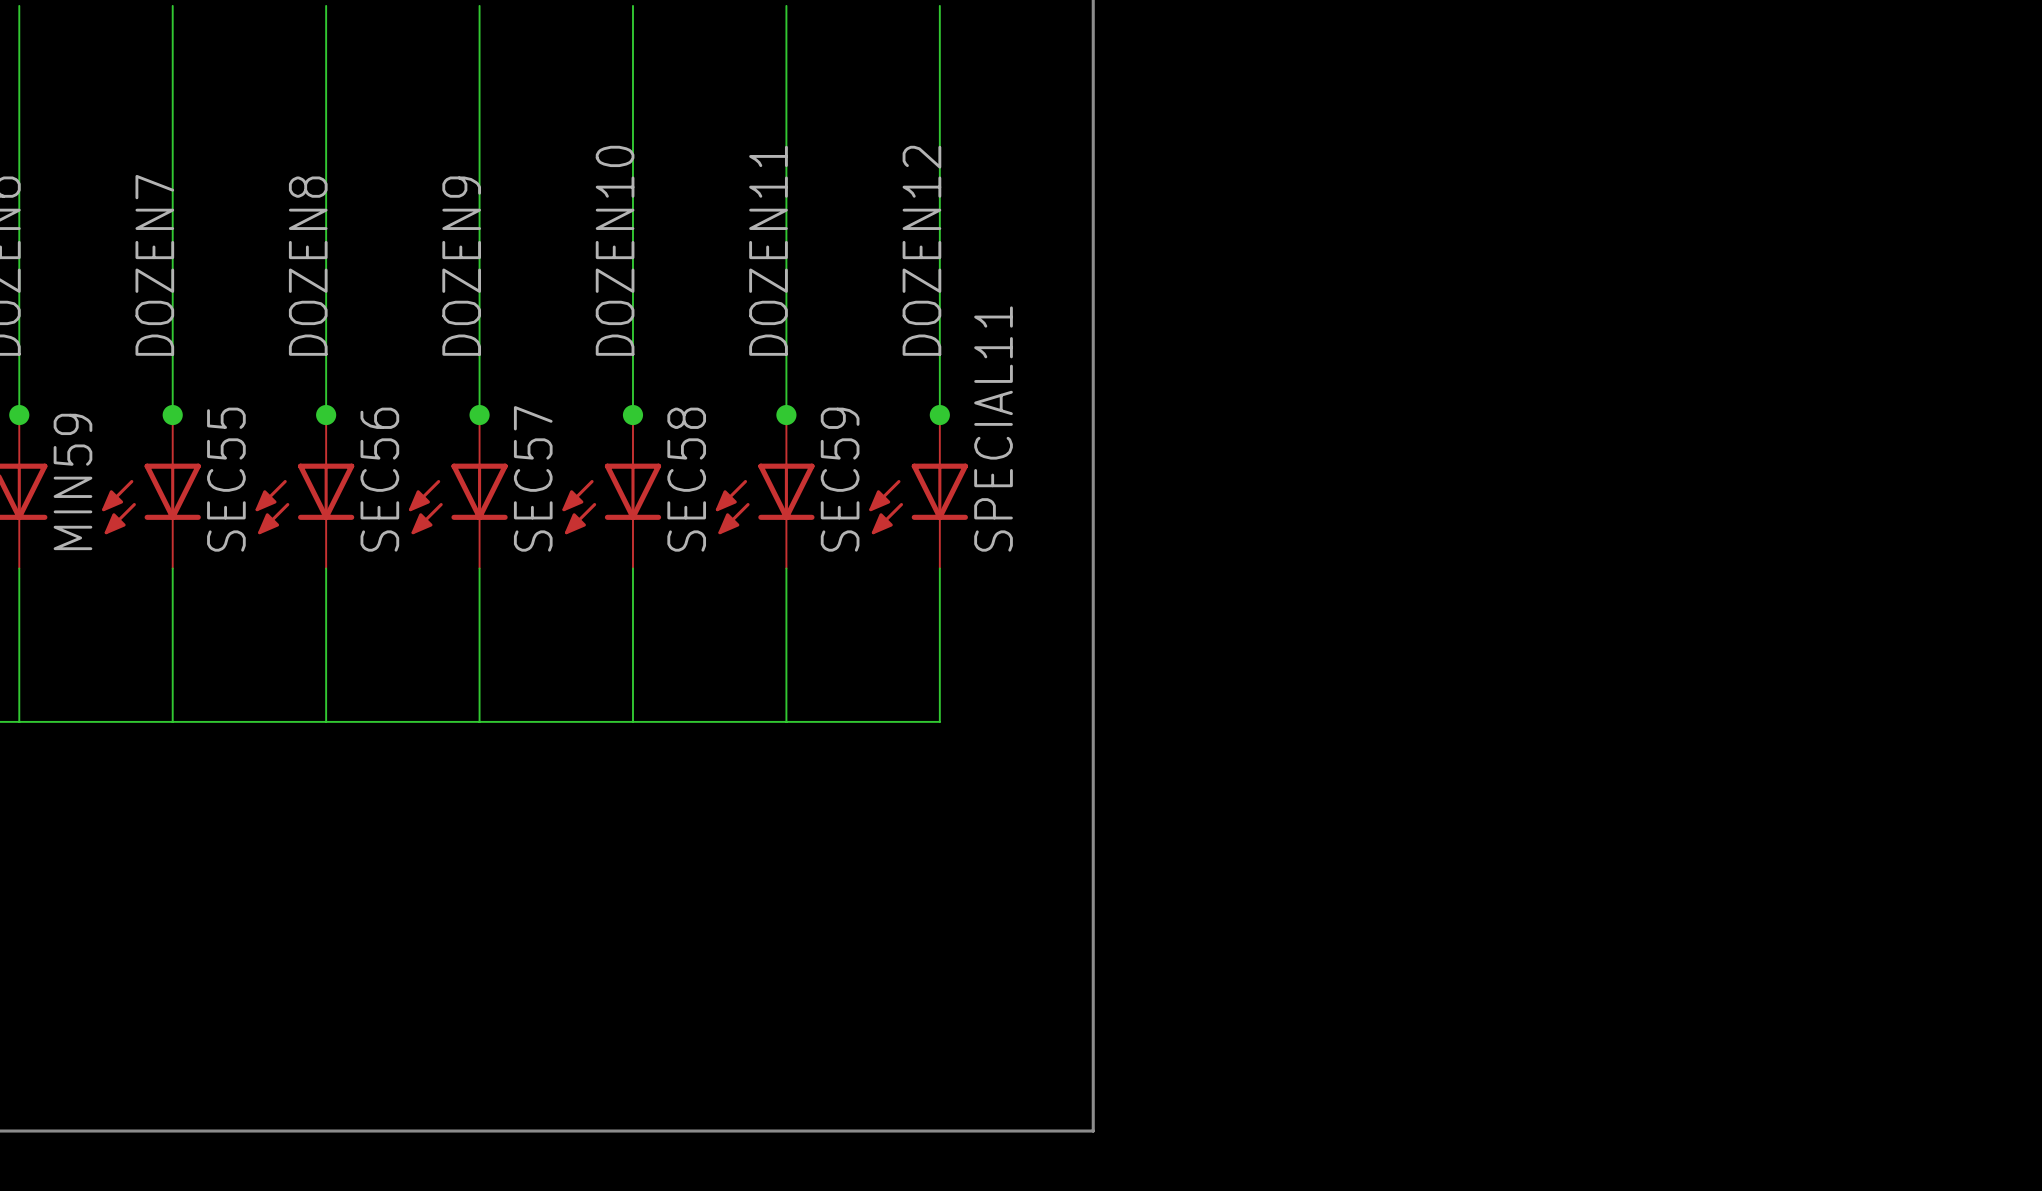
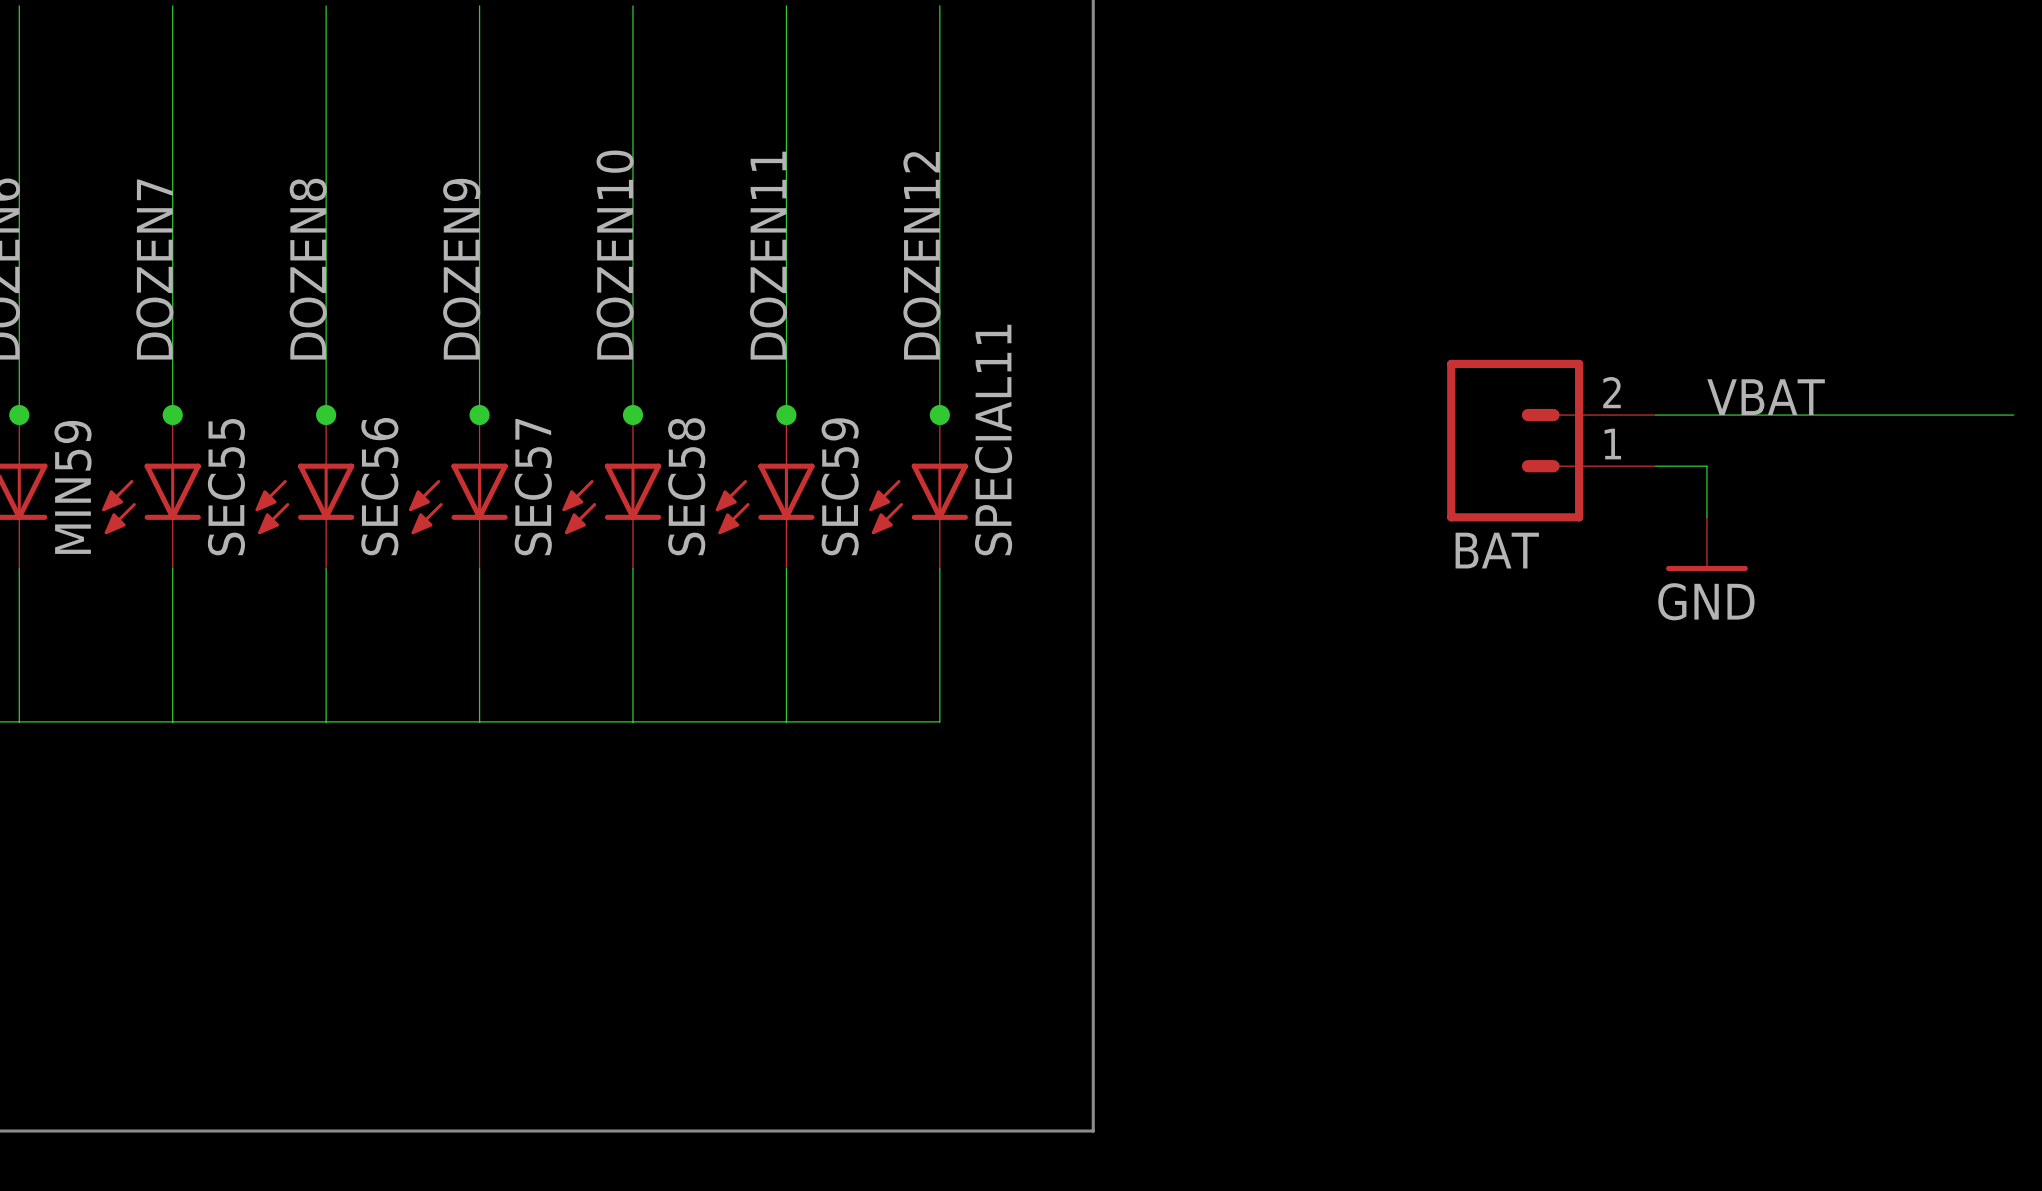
label: none -> VBAT (1766, 397)
wire: none -> (1655, 415) (2013, 415)
BAT: none -> (1551, 440)
wire: none -> (1655, 466) (1706, 466) (1706, 517)
power symbol: none -> GND (1706, 544)

